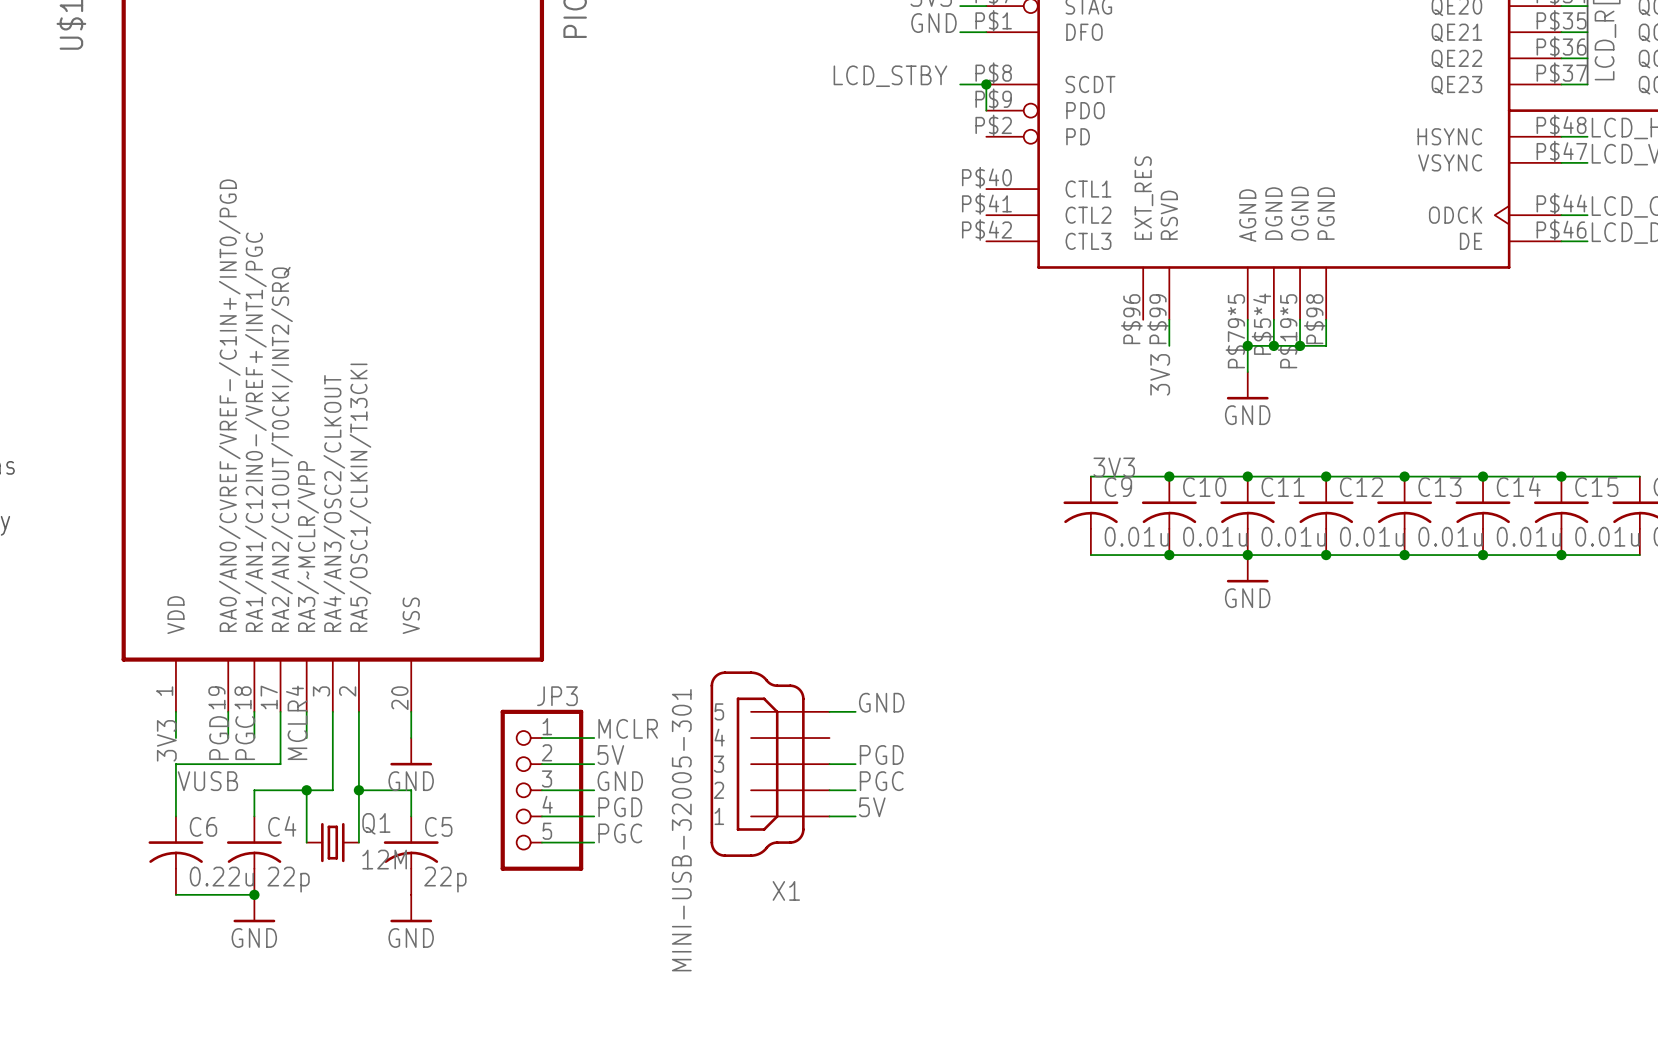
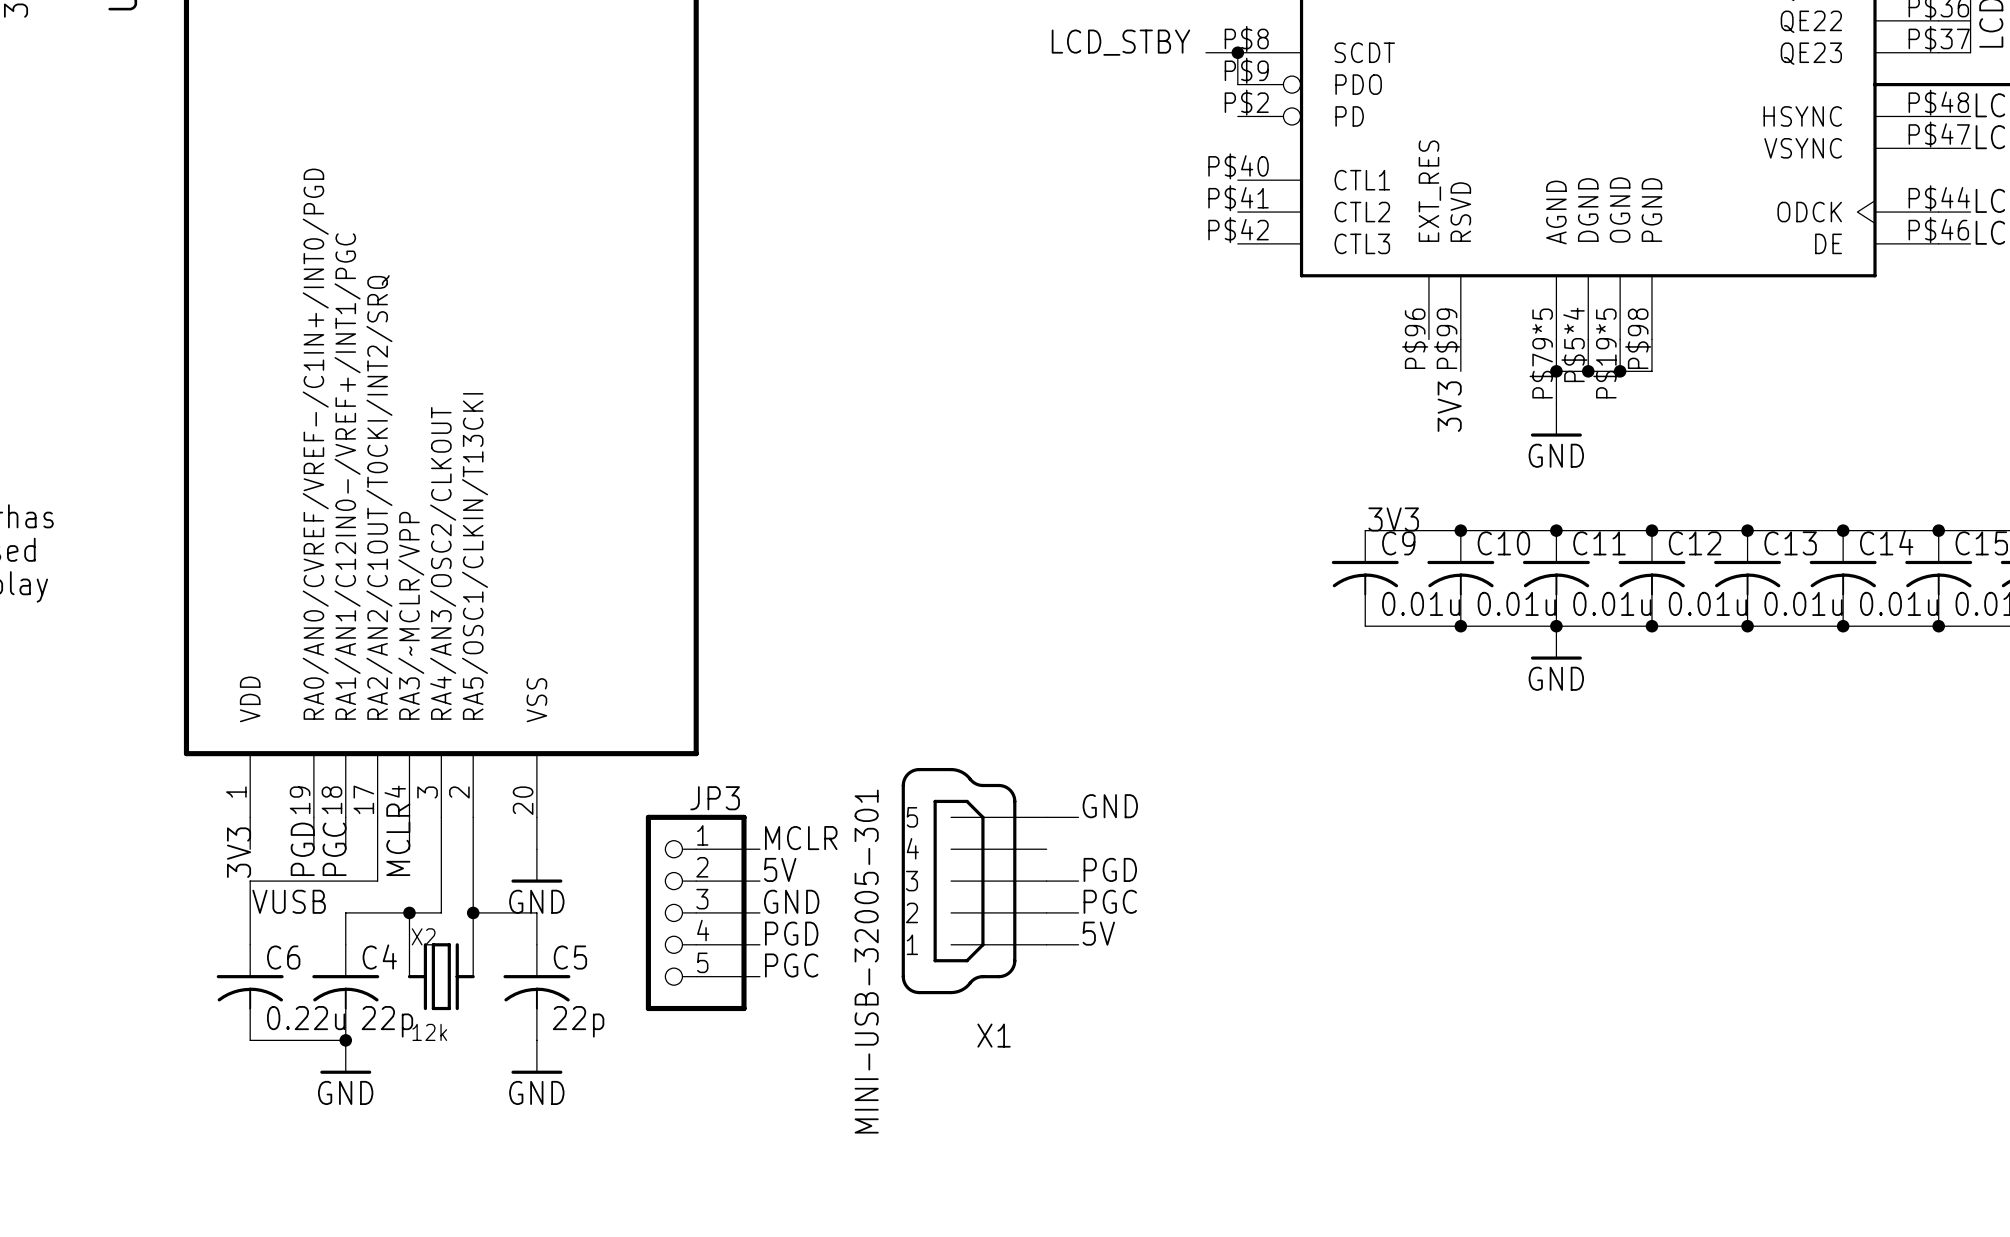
Q1: 12M (332, 842) -> none
X2: none -> 12k (441, 976)

